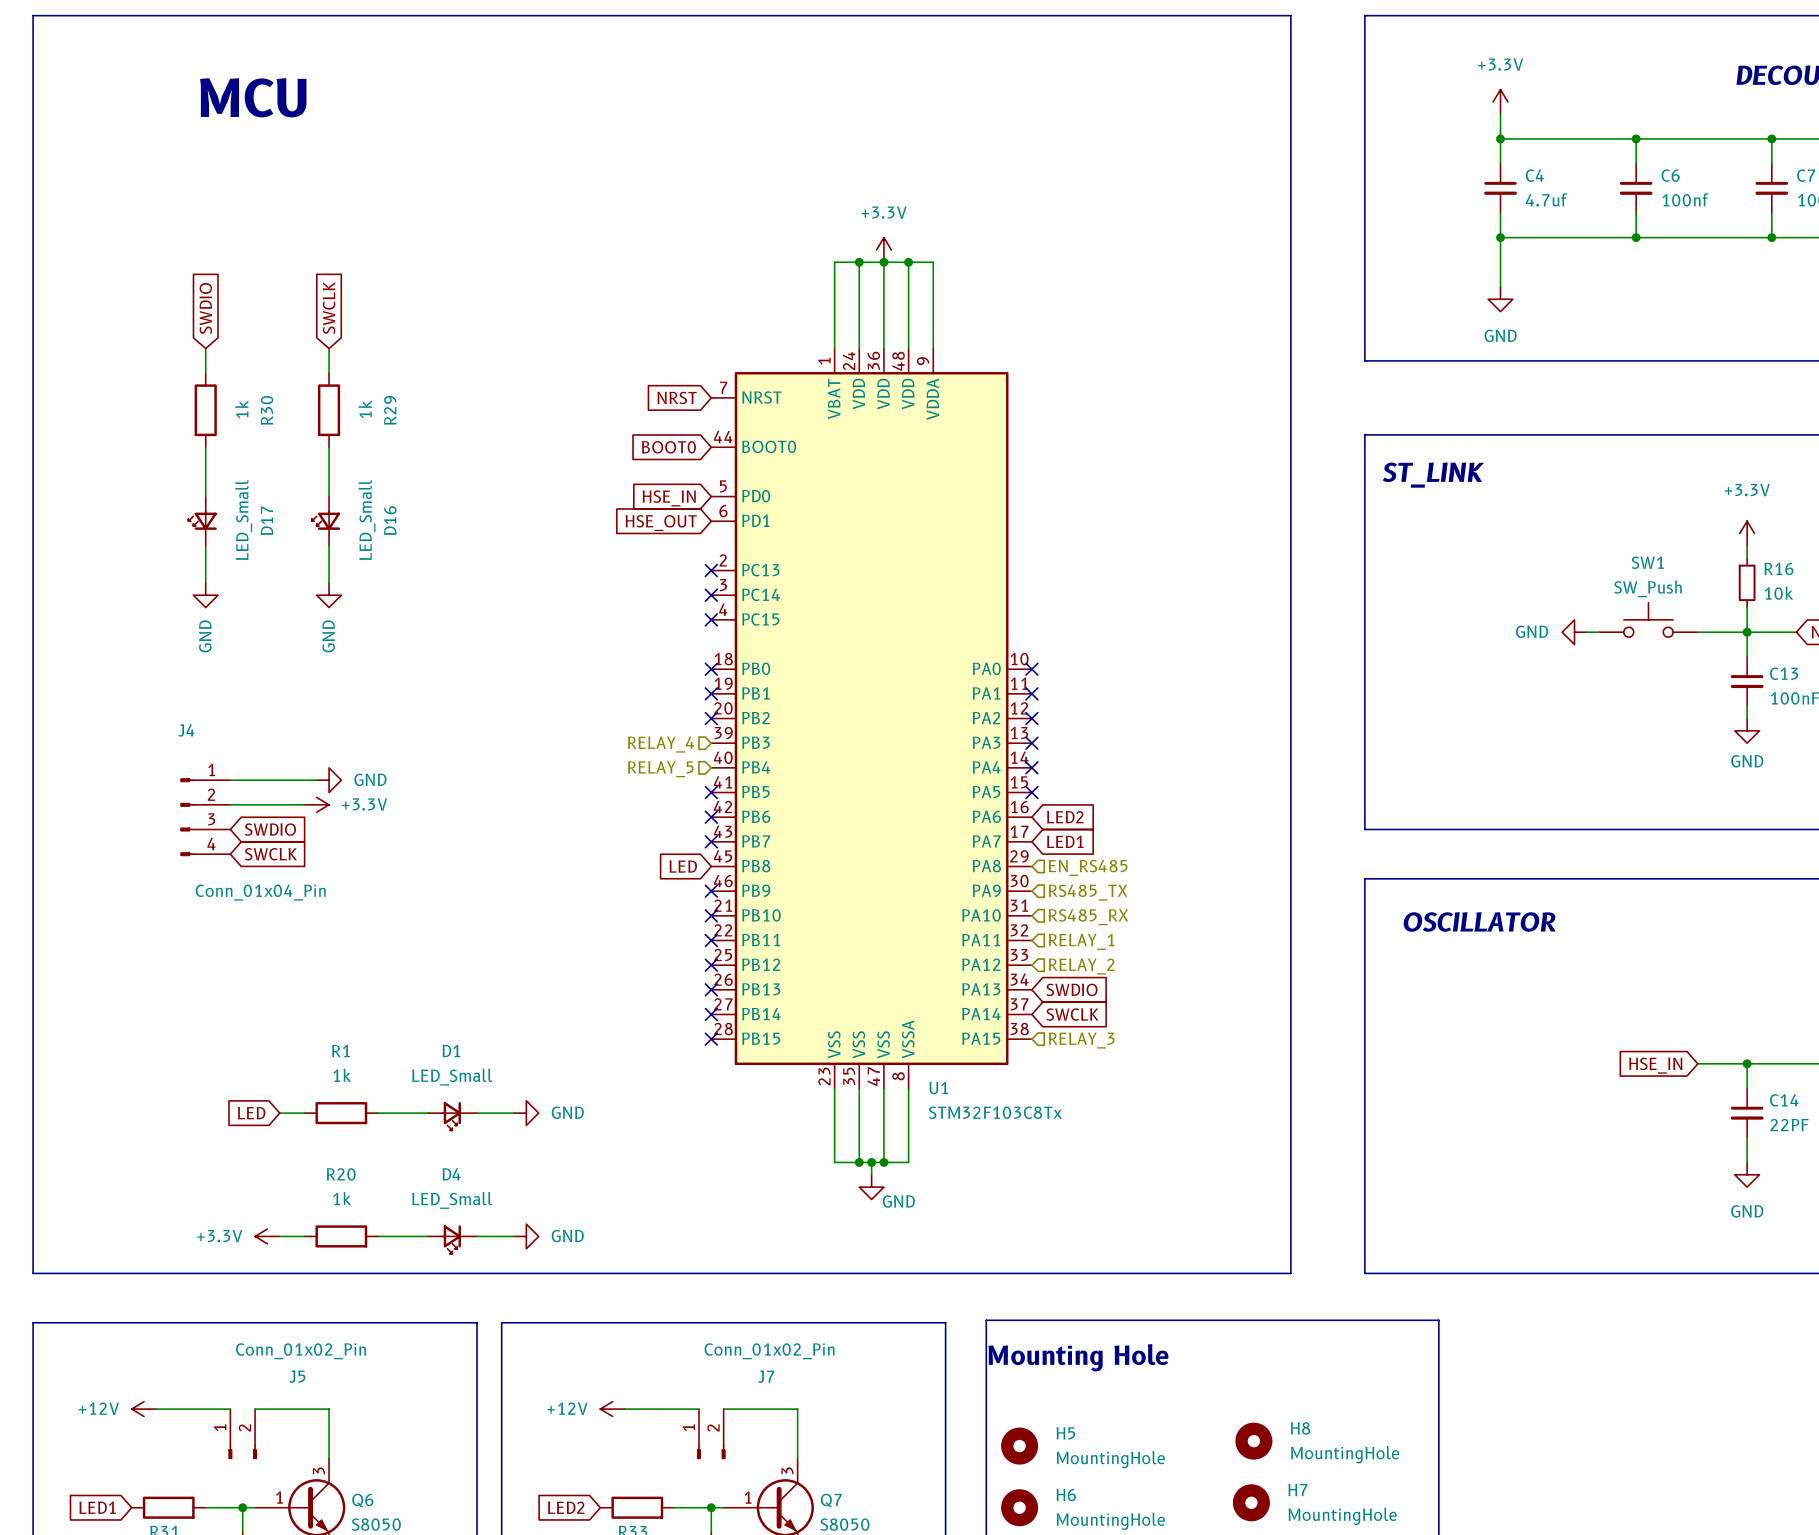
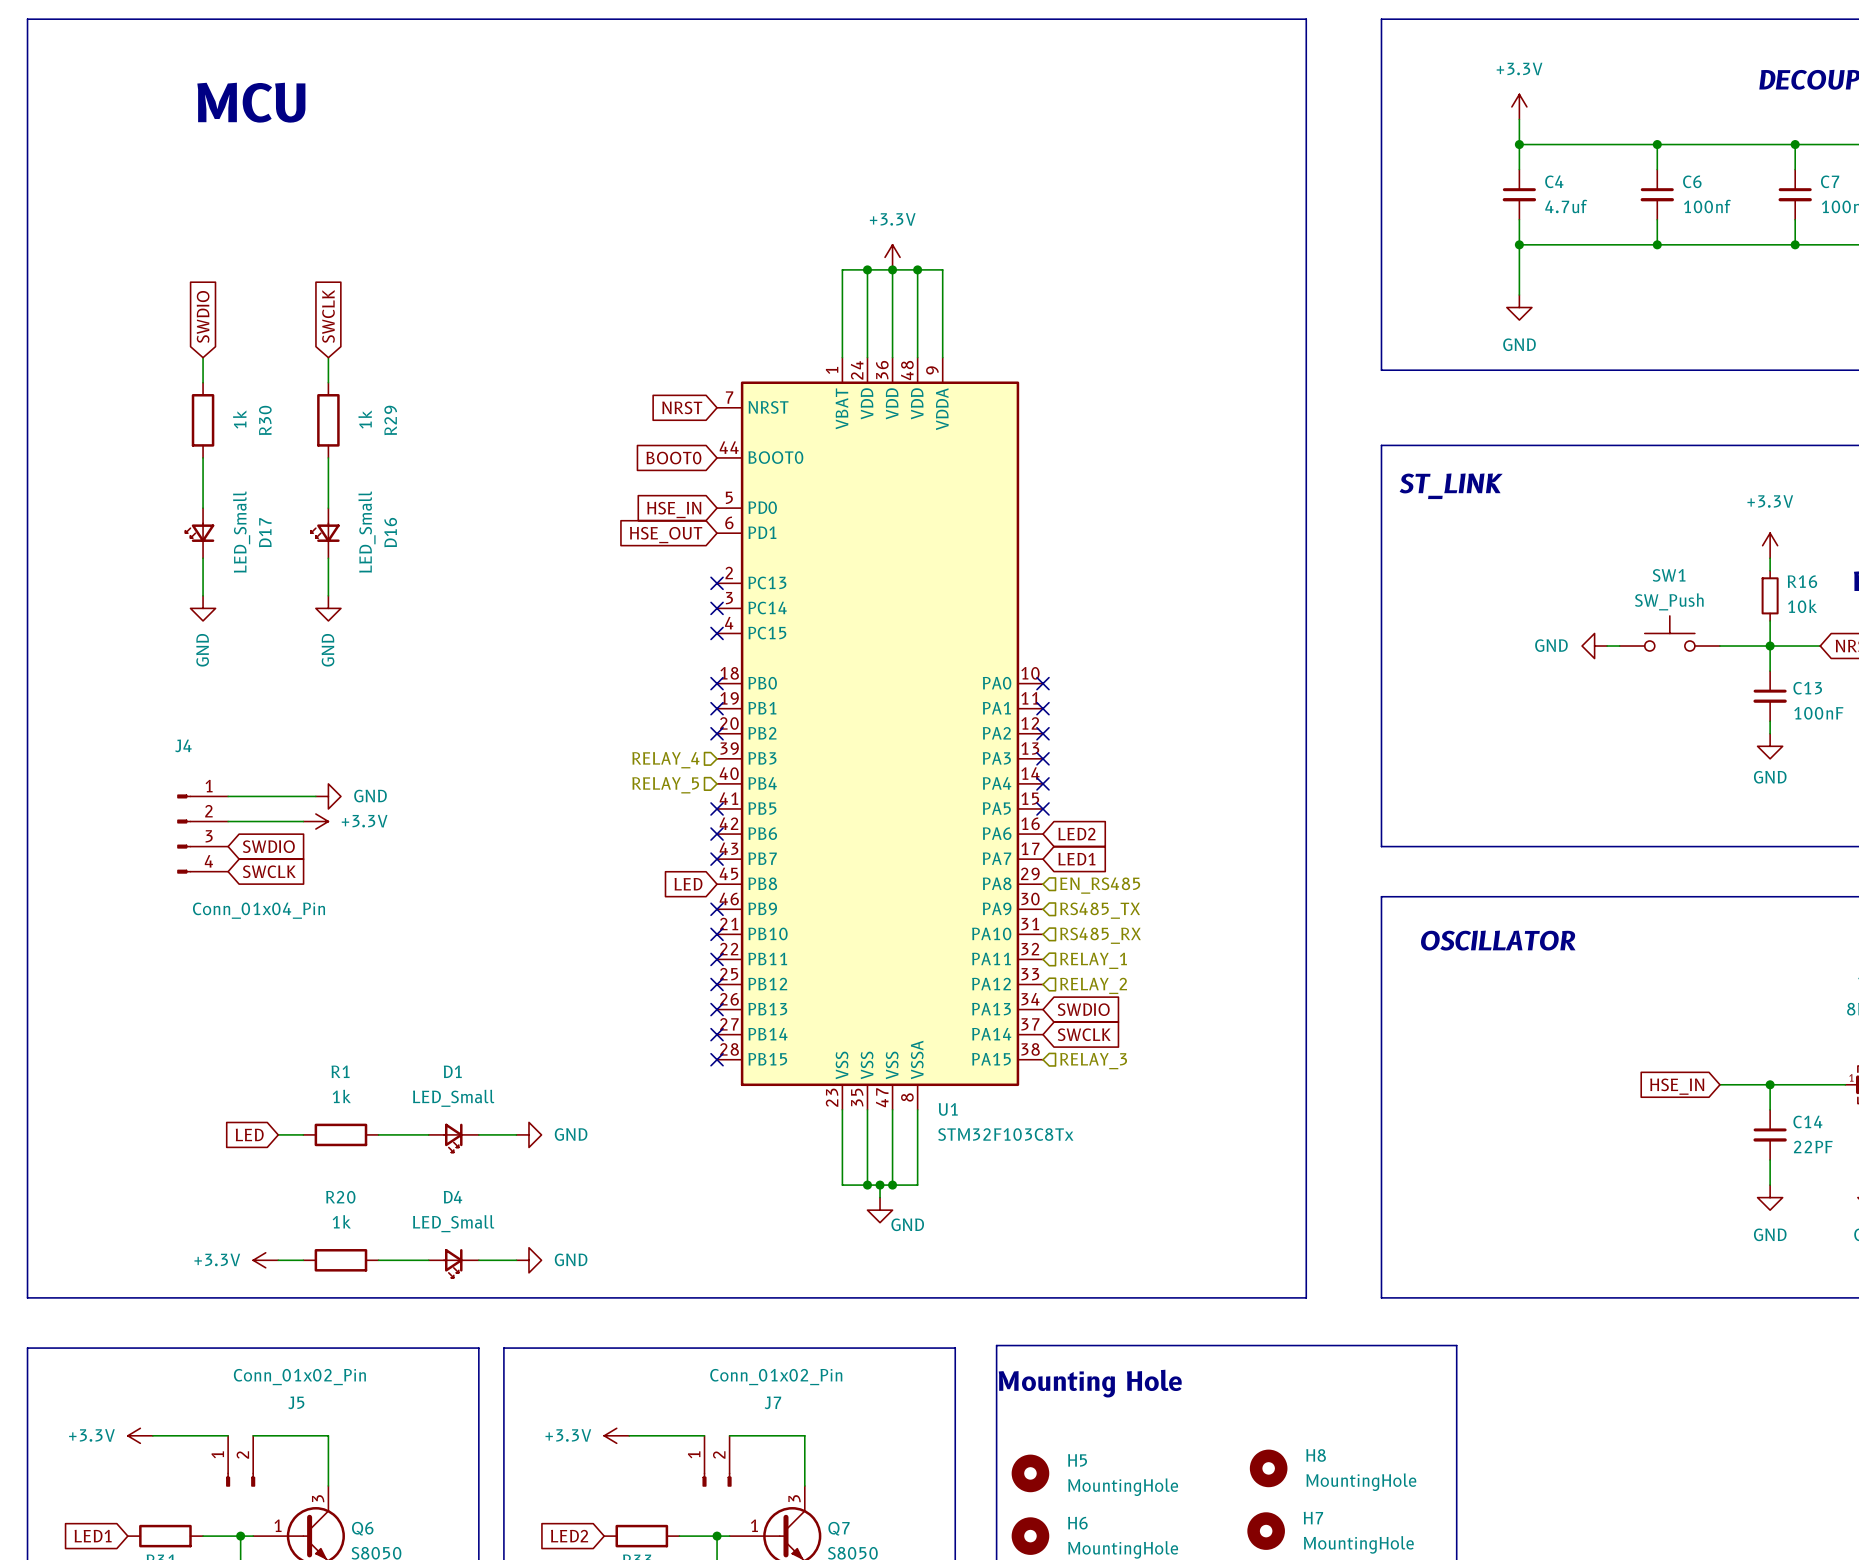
power symbol: +12V (144, 1409) -> +3.3V (140, 1435)
power symbol: +12V (612, 1409) -> +3.3V (616, 1435)

